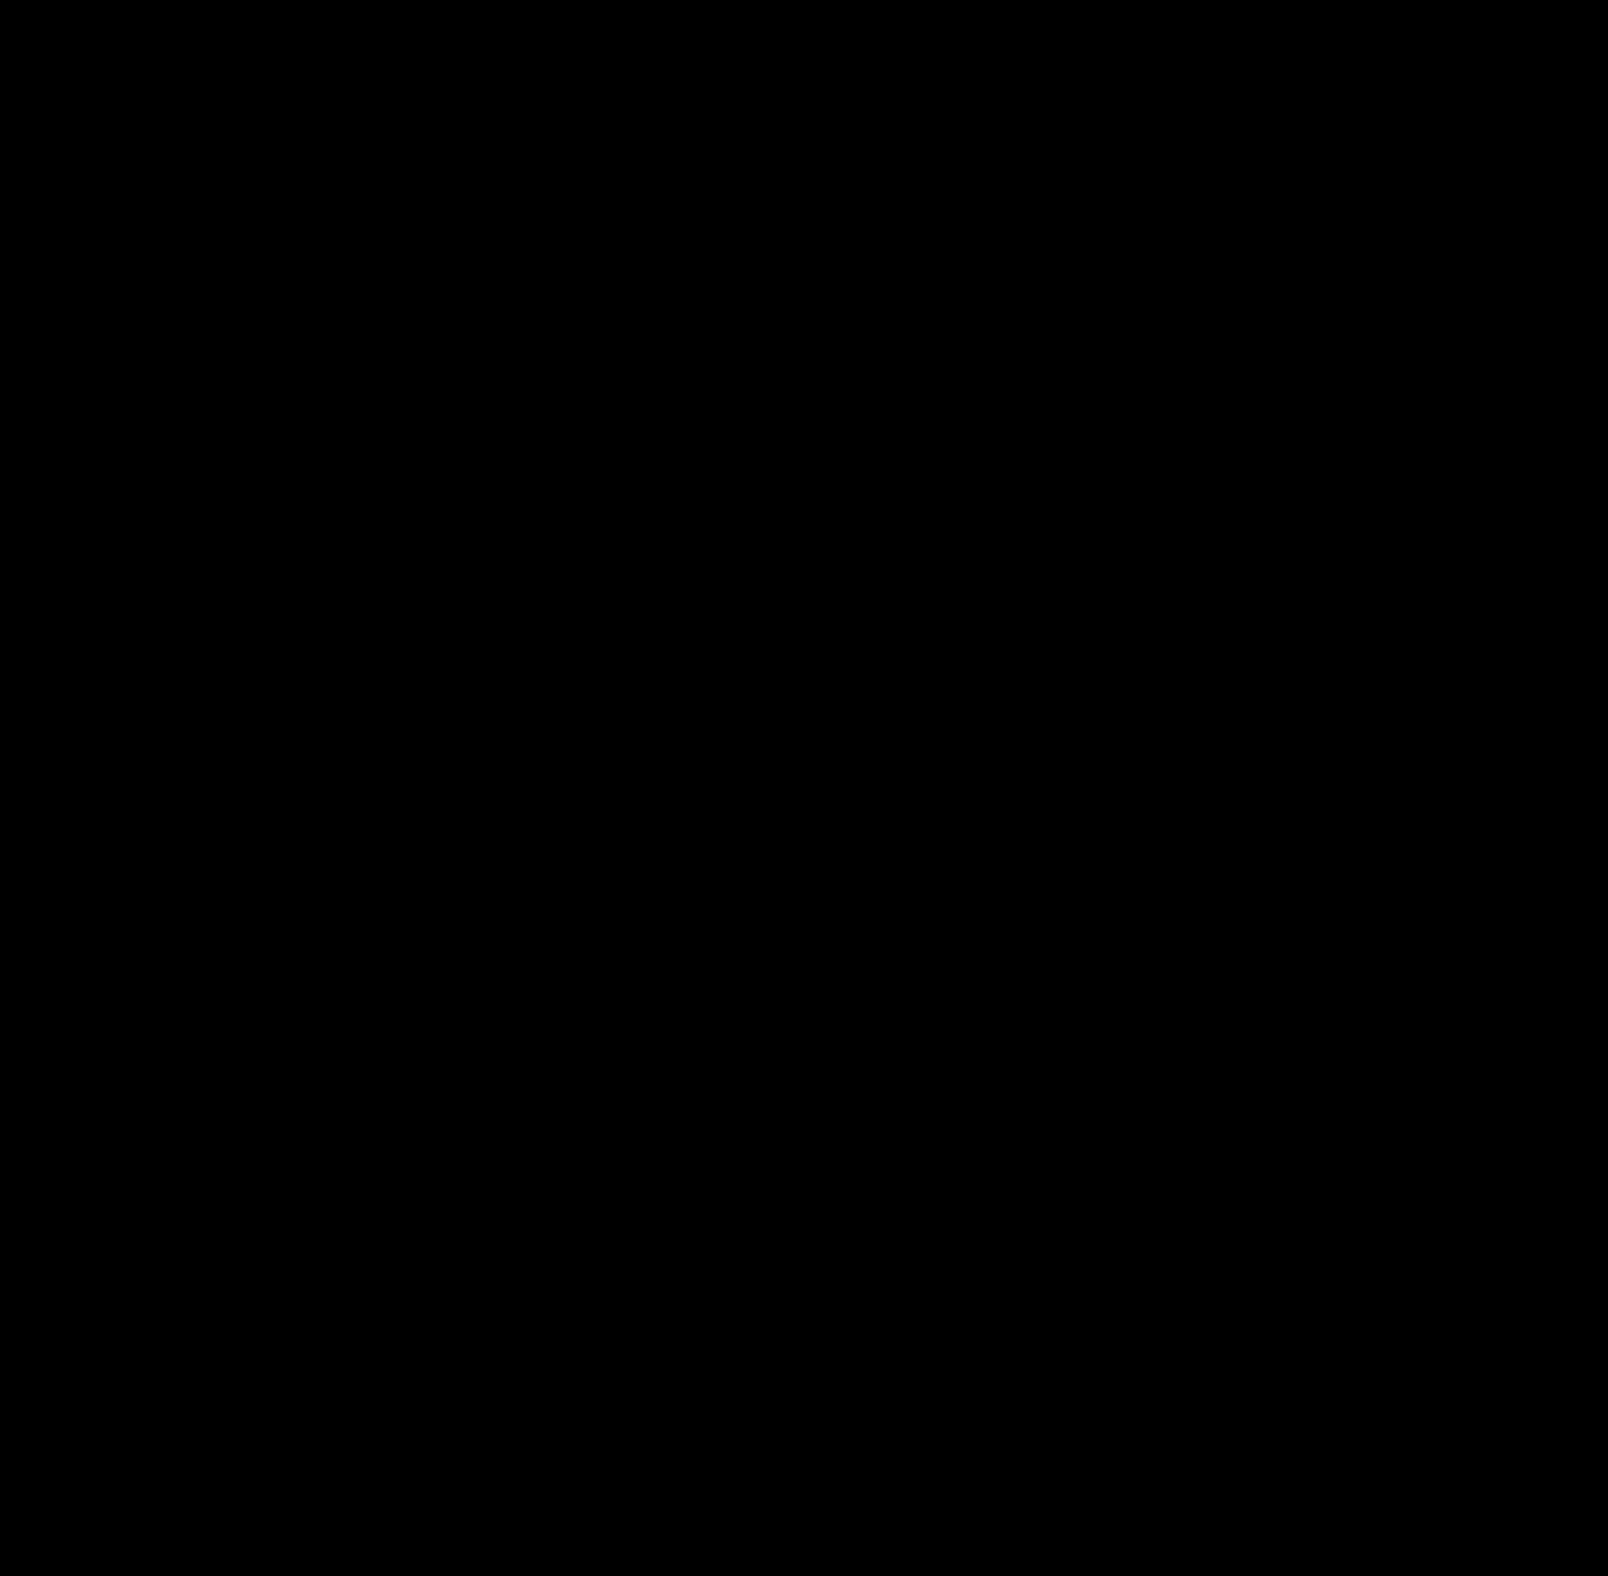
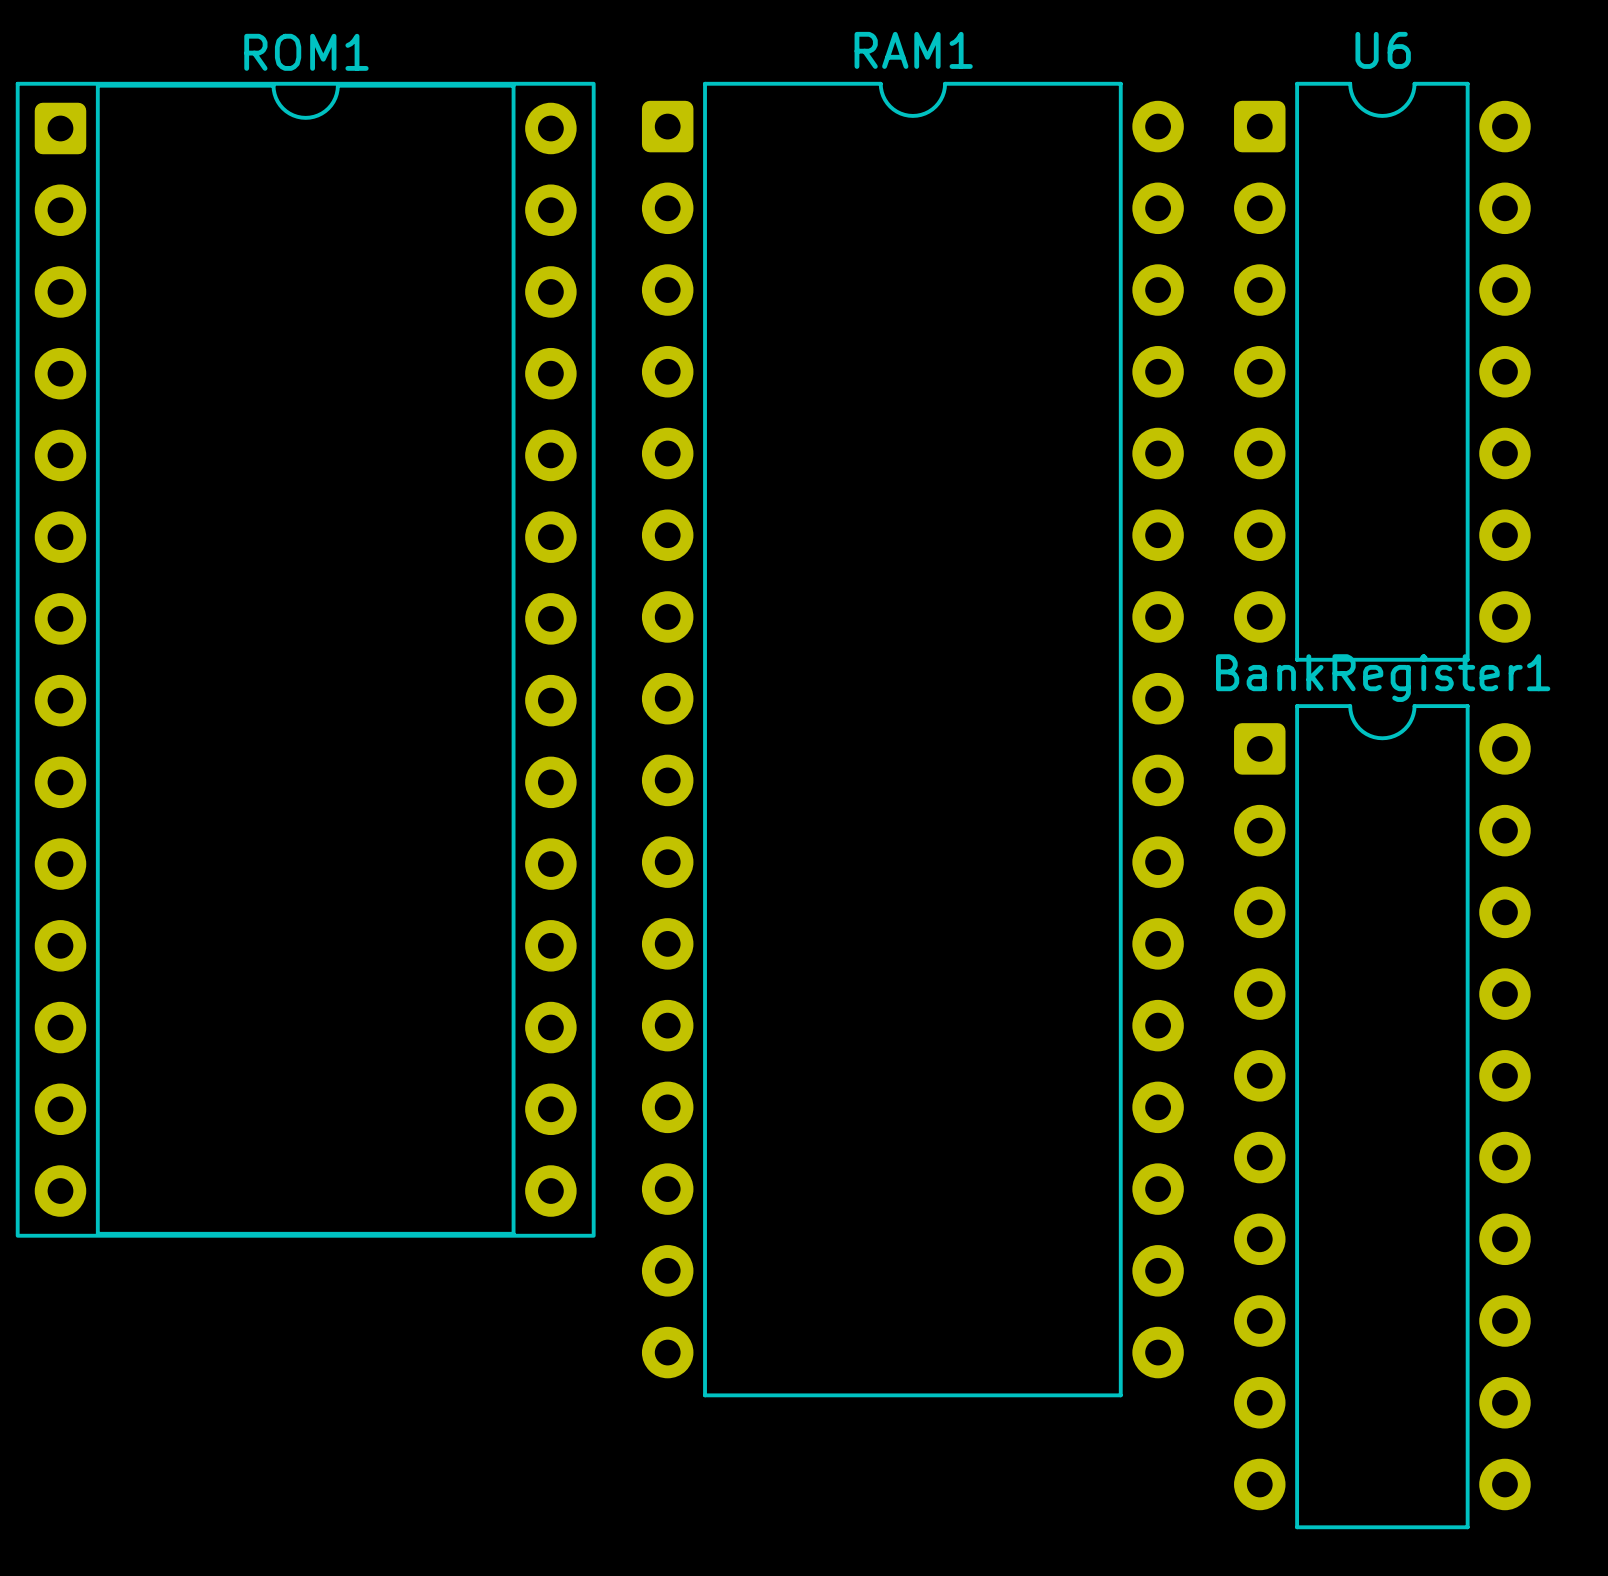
U6: none -> (1382, 371)
ROM1: none -> (305, 659)
RAM1: none -> (912, 739)
BankRegister1: none -> (1382, 1116)

